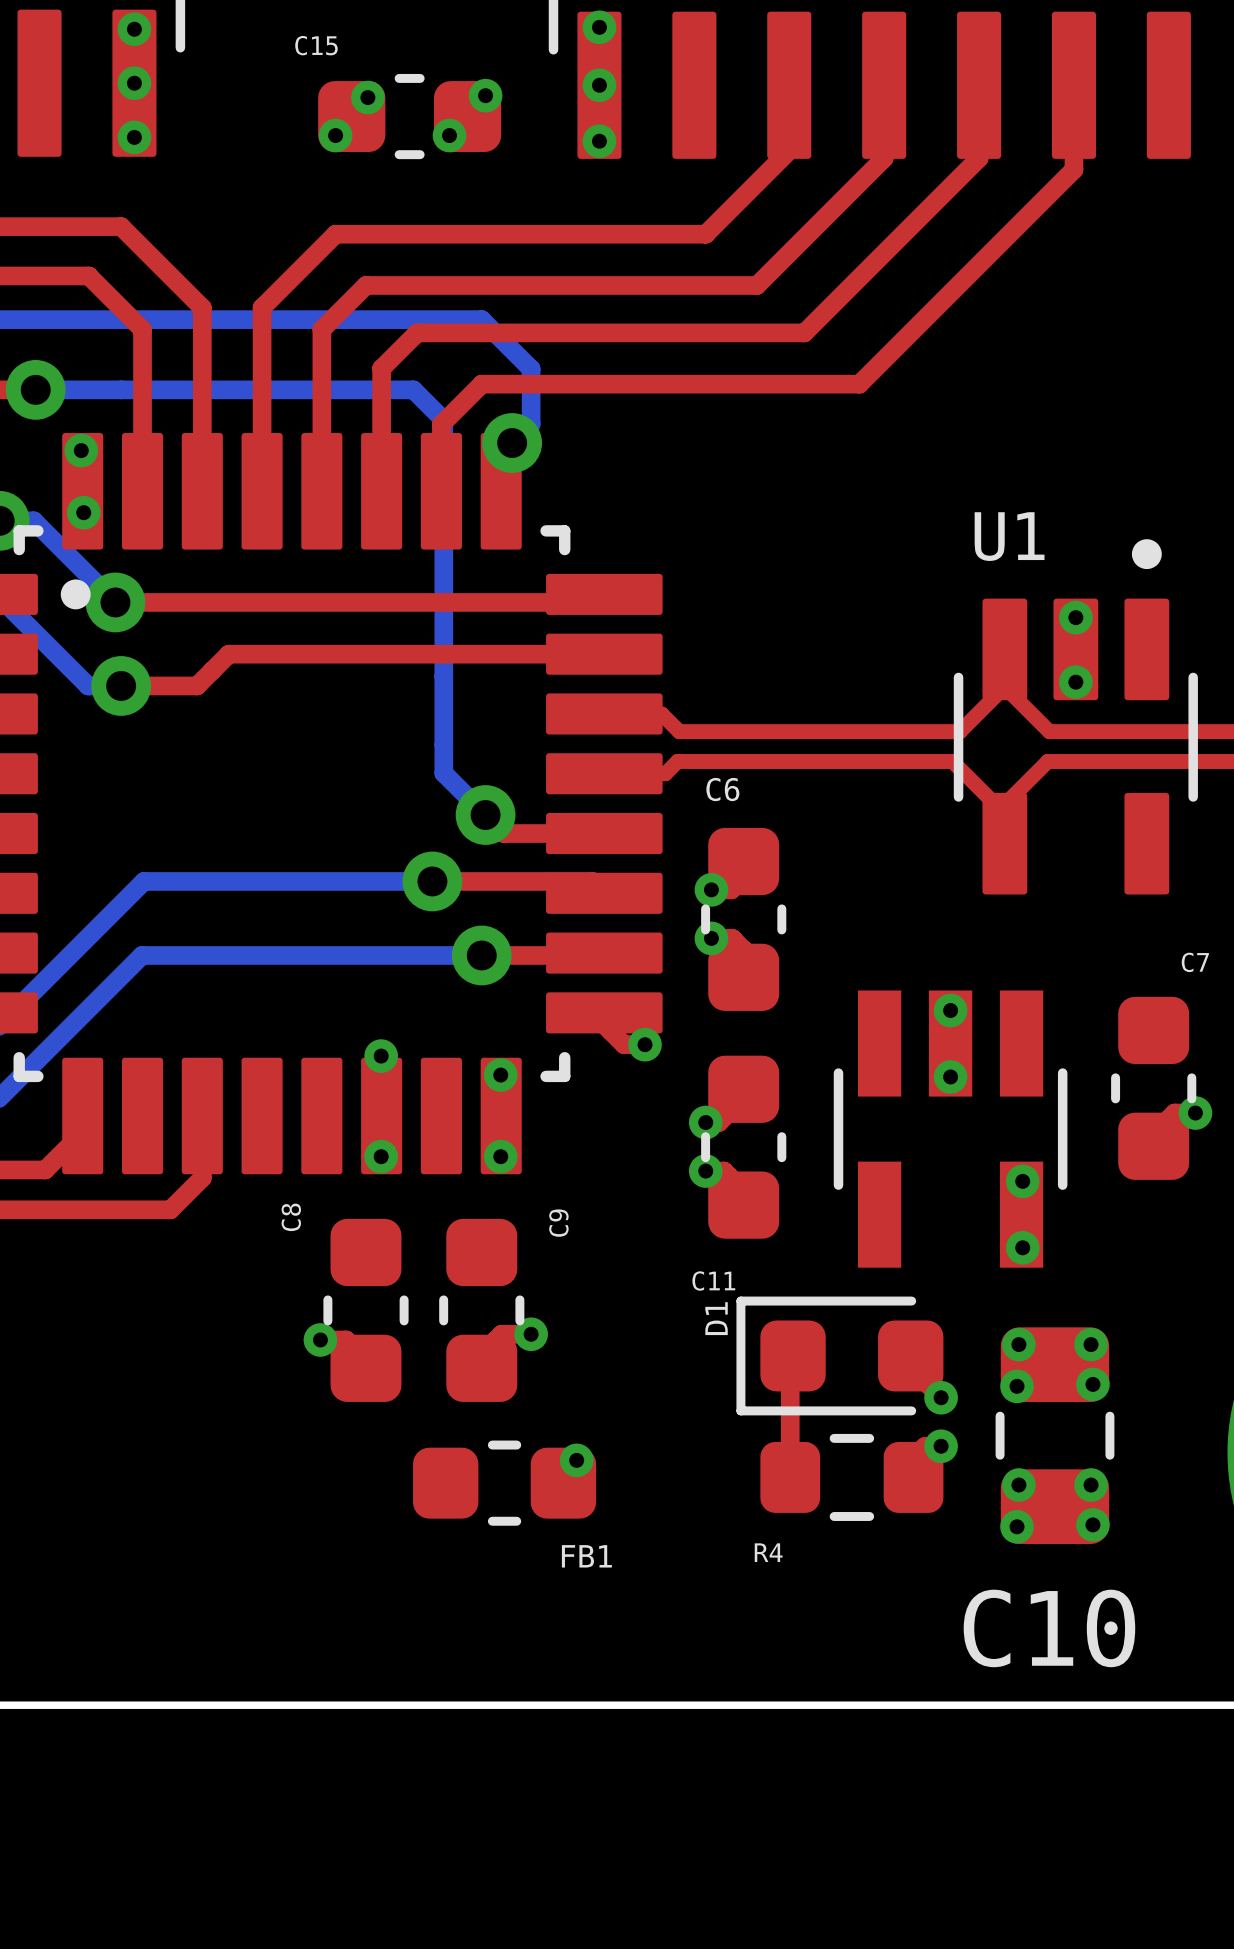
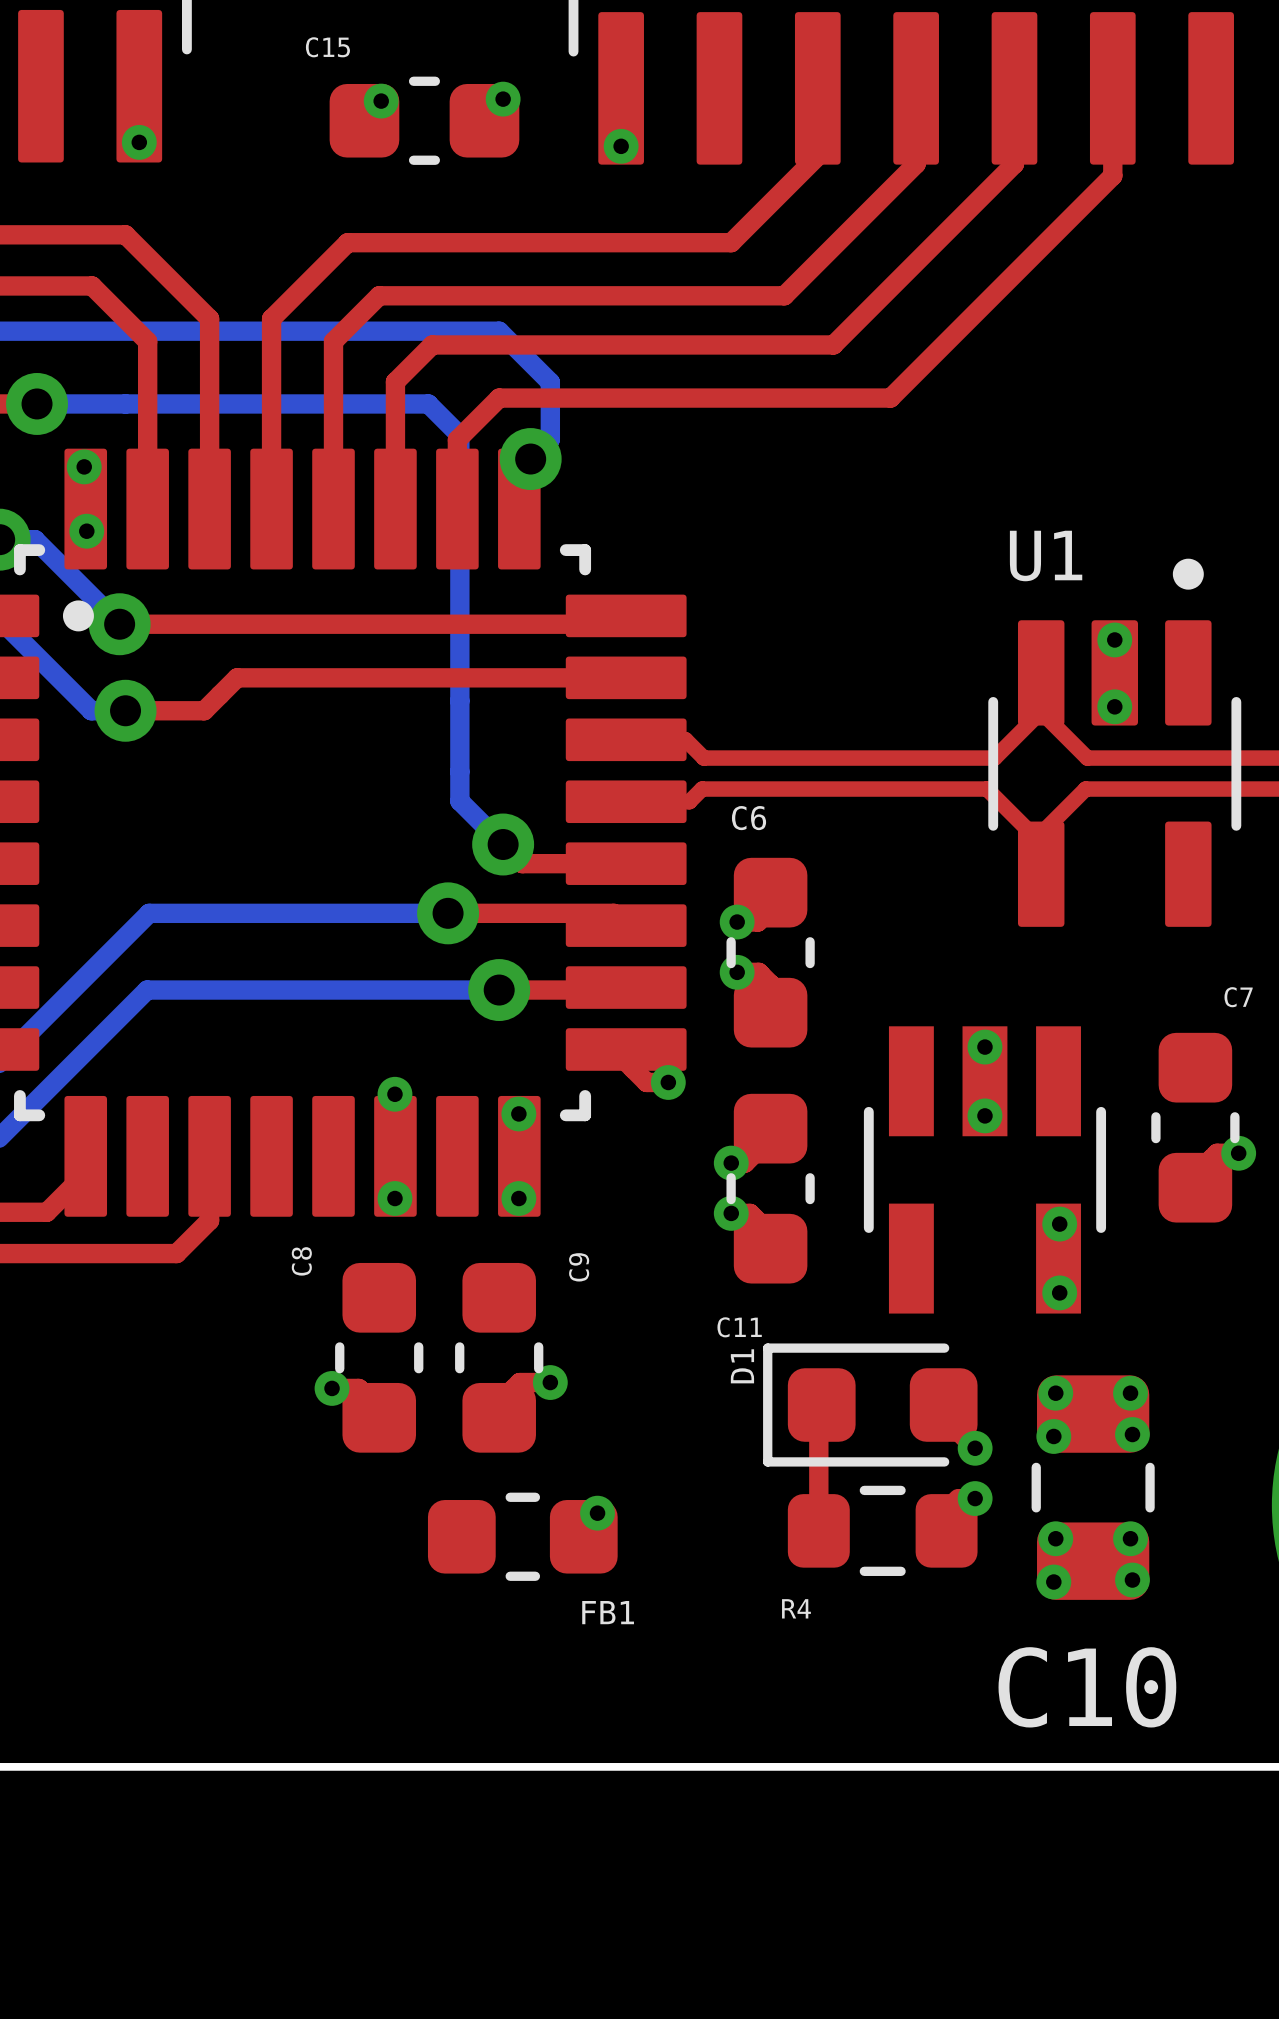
via: (599, 27) -> none
via: (134, 29) -> none
via: (134, 83) -> none
via: (599, 85) -> none
via: (335, 135) -> none
via: (449, 135) -> none

